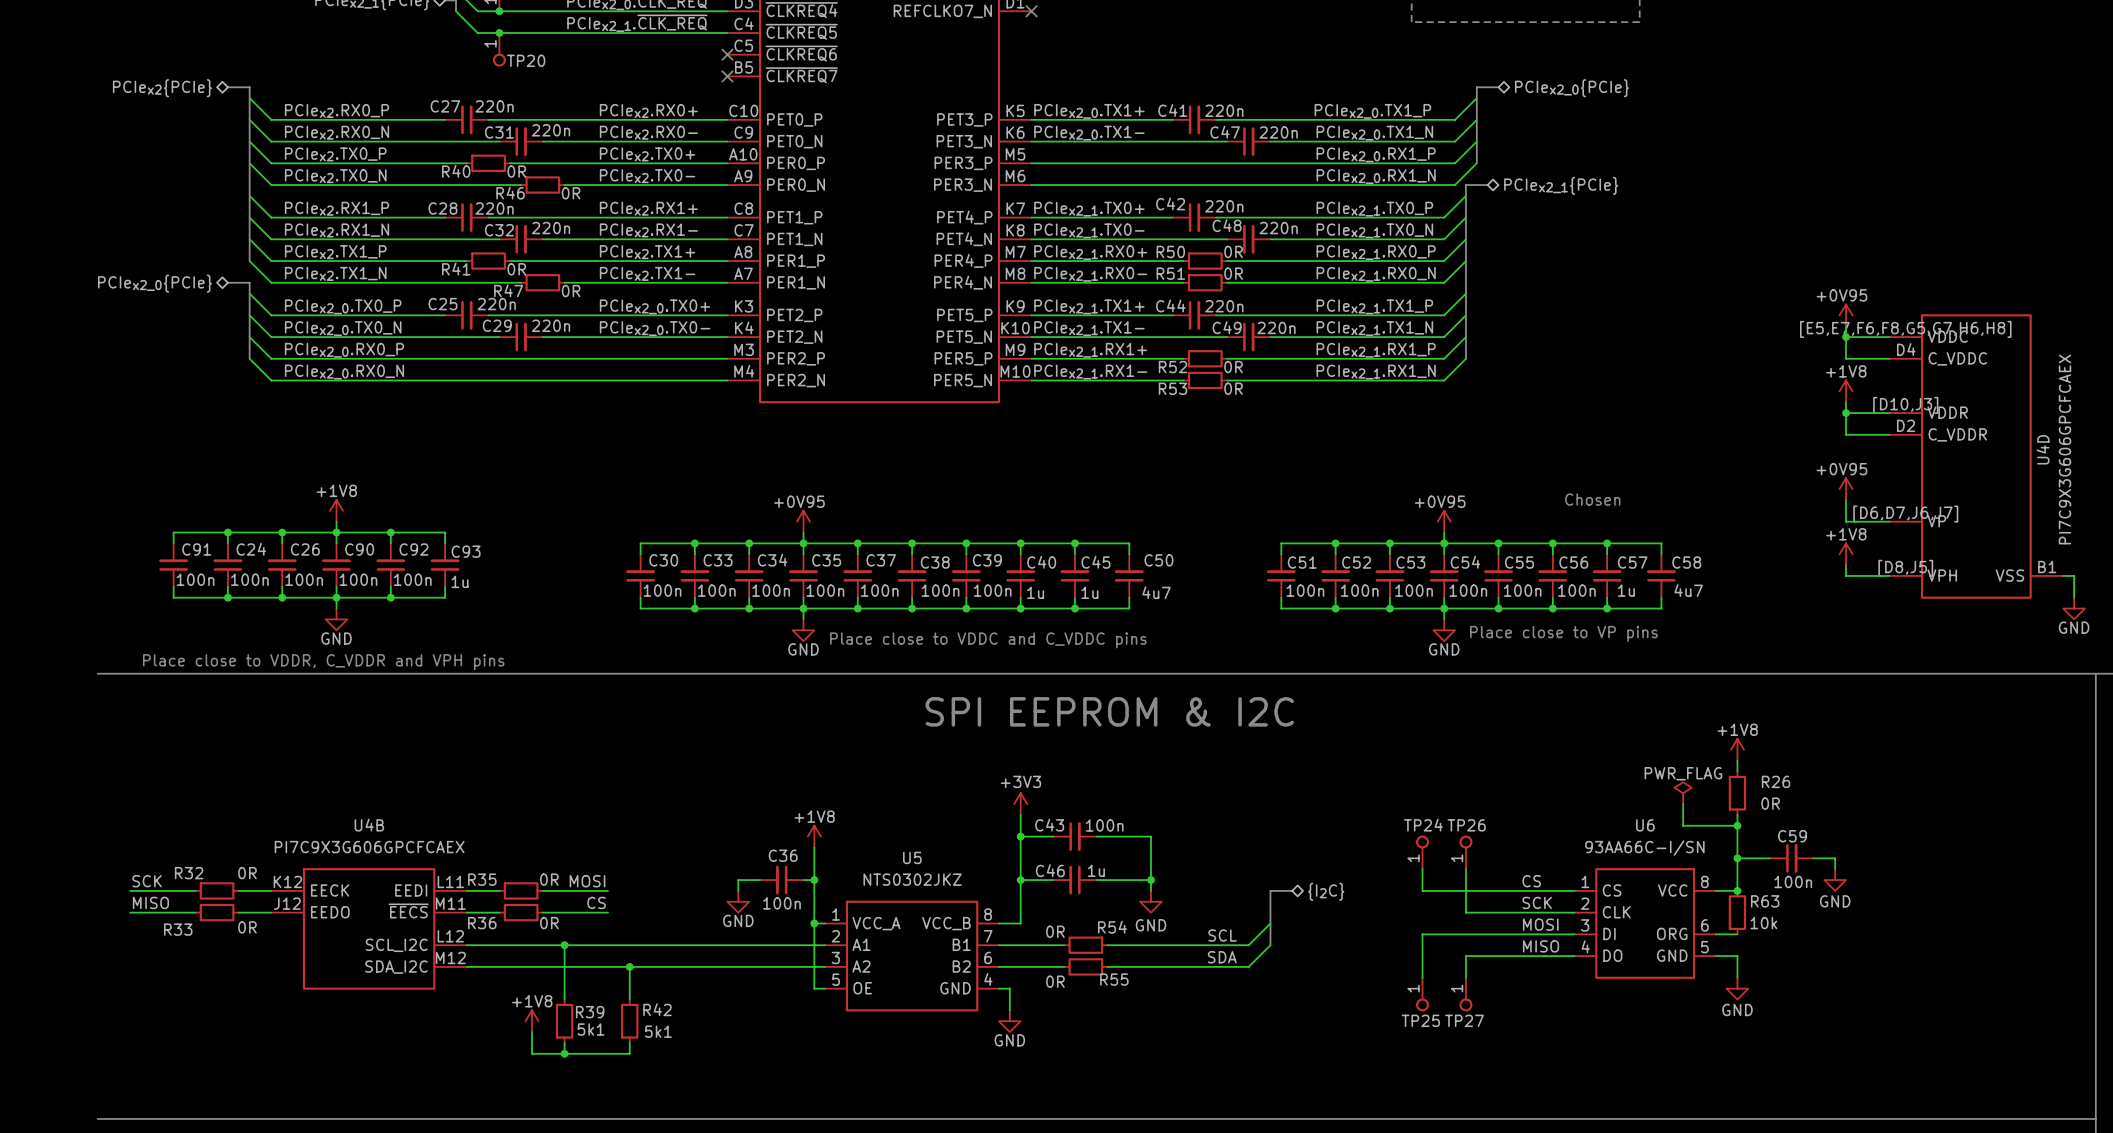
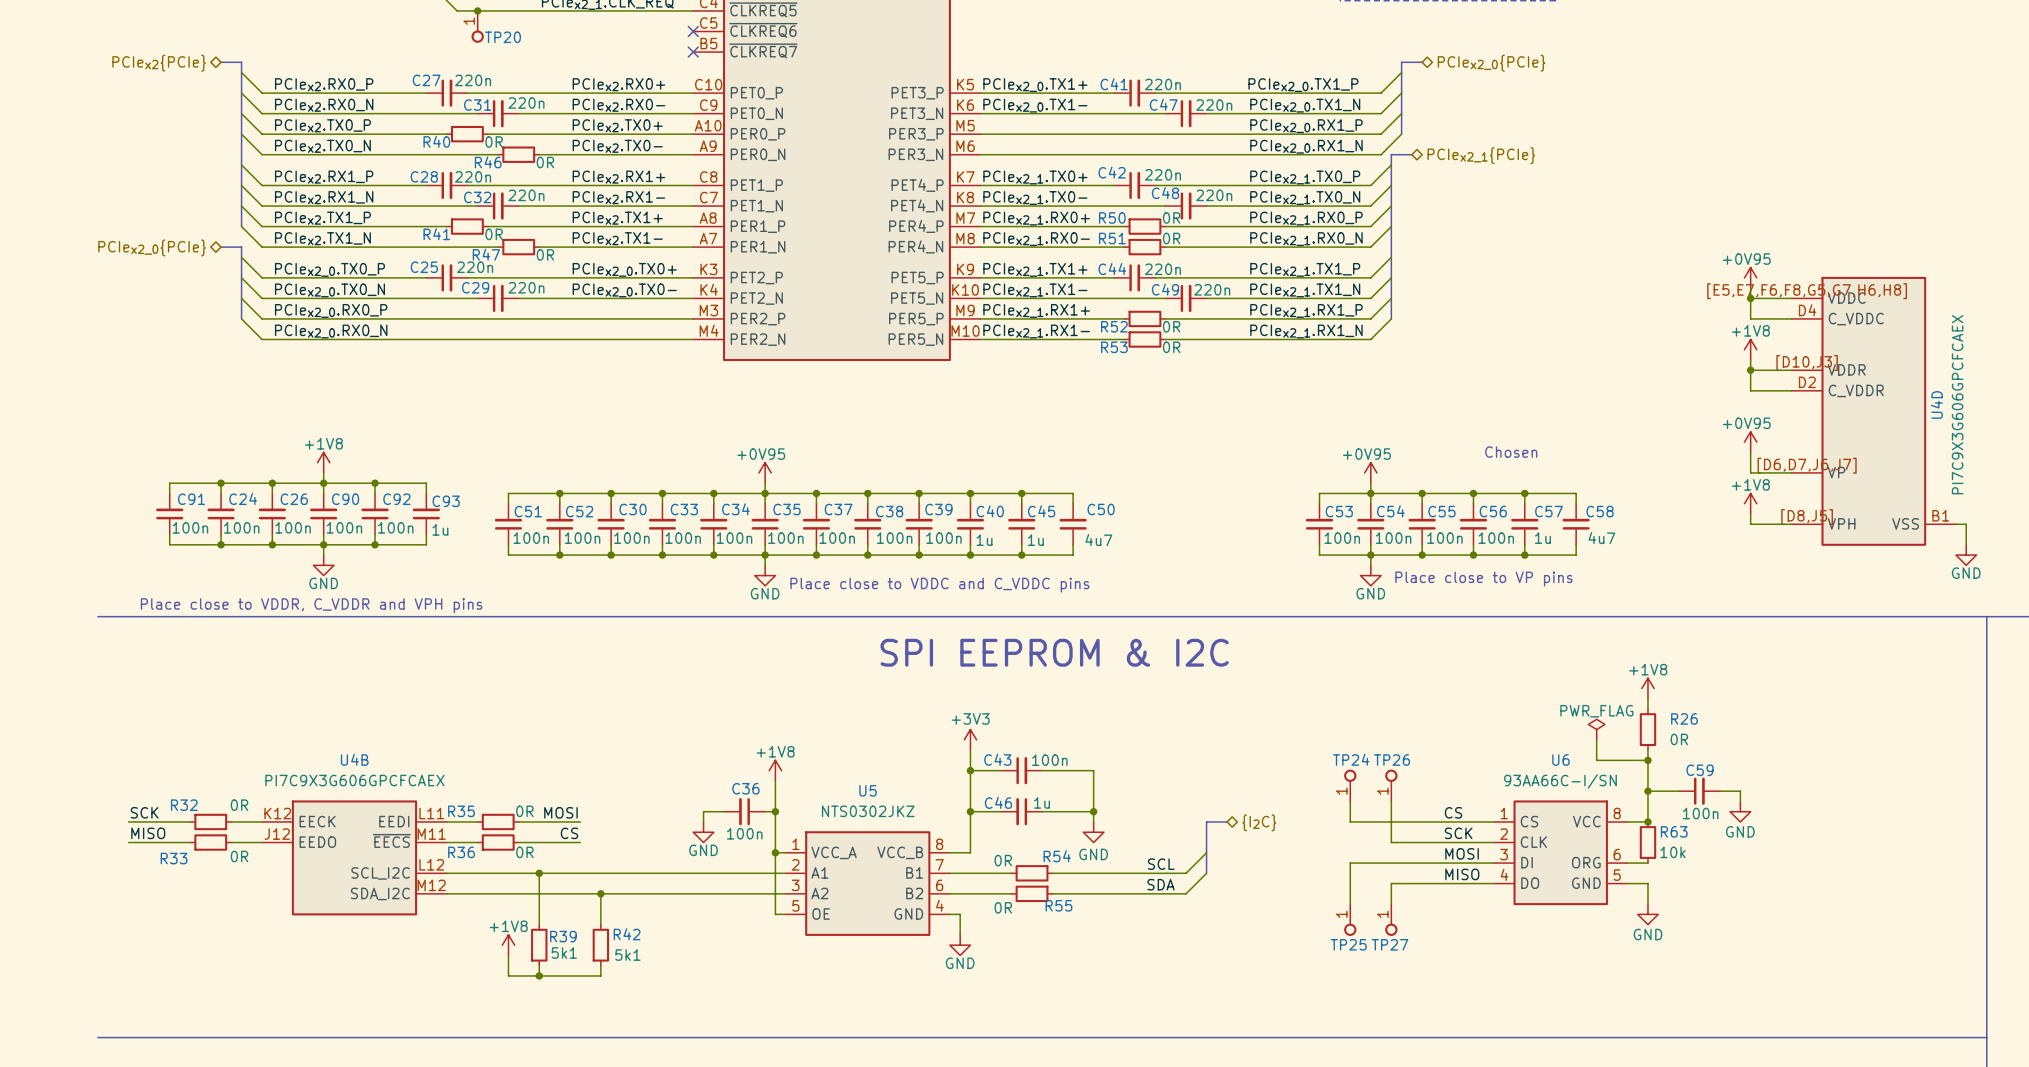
wire: none -> (559, 493) (559, 503)
junction: none -> (559, 493)
wire: none -> (611, 493) (508, 493) (508, 503)
junction: none -> (611, 493)
wire: (1335, 543) (1335, 554) -> none
junction: (1335, 543) -> none
wire: (1389, 543) (1281, 543) (1281, 554) -> none
junction: (1389, 543) -> none
C51 position: (1281, 575) -> (508, 524)
C52 position: (1335, 575) -> (559, 524)
wire: none -> (508, 544) (508, 555) (611, 555)
wire: none -> (559, 544) (559, 555)
wire: (1281, 597) (1281, 608) (1389, 608) -> none
wire: (1335, 597) (1335, 608) -> none
junction: none -> (559, 555)
junction: none -> (611, 555)
junction: (1335, 608) -> none
junction: (1389, 608) -> none

